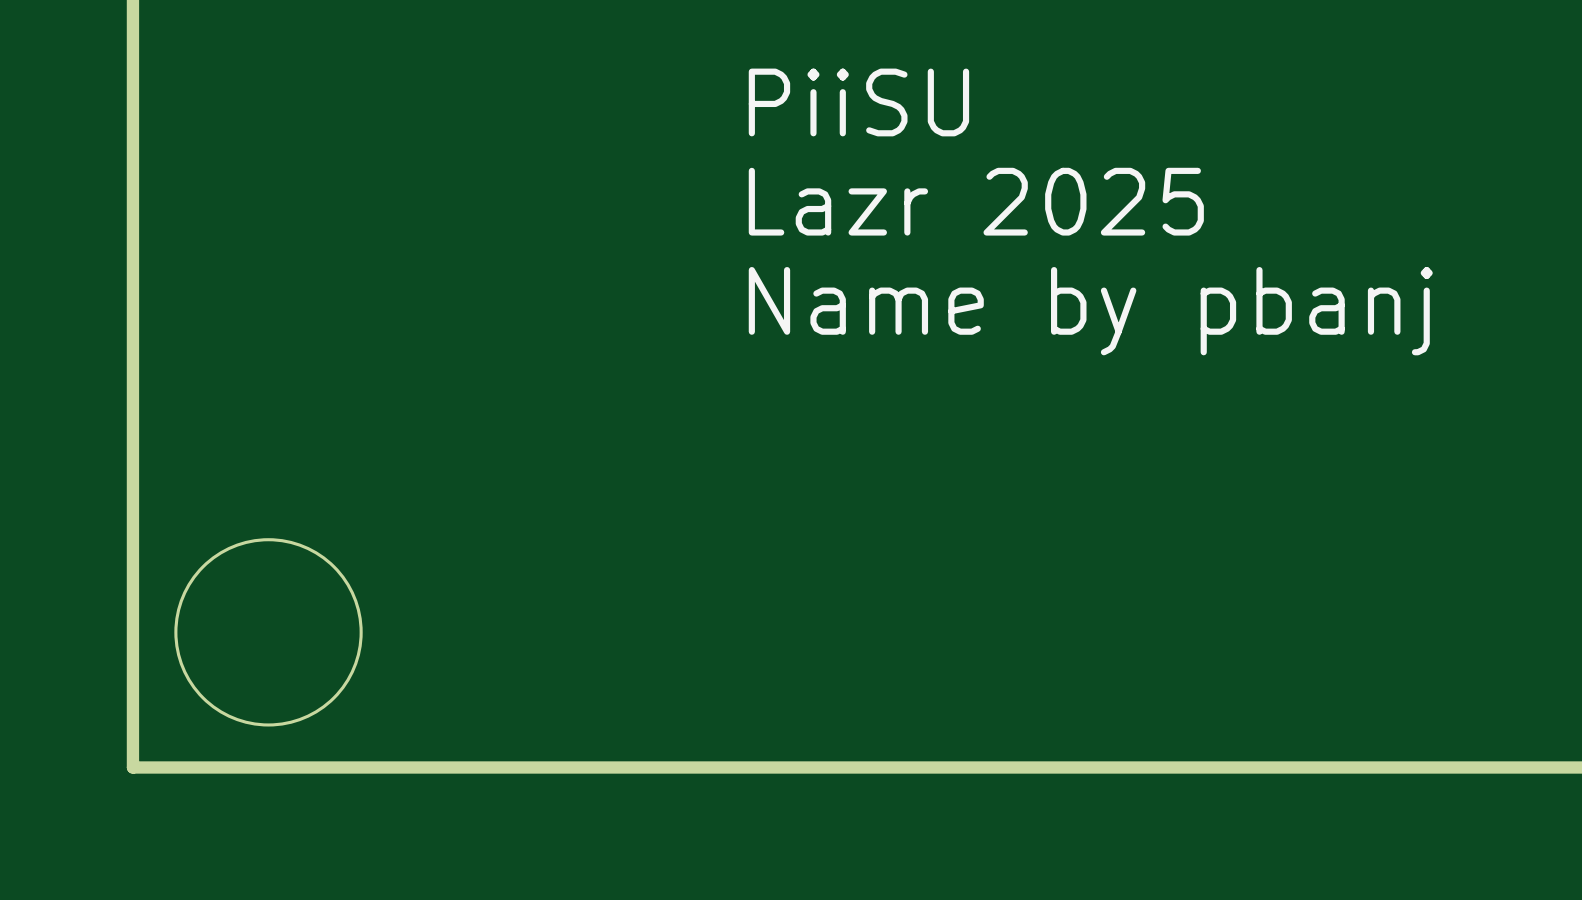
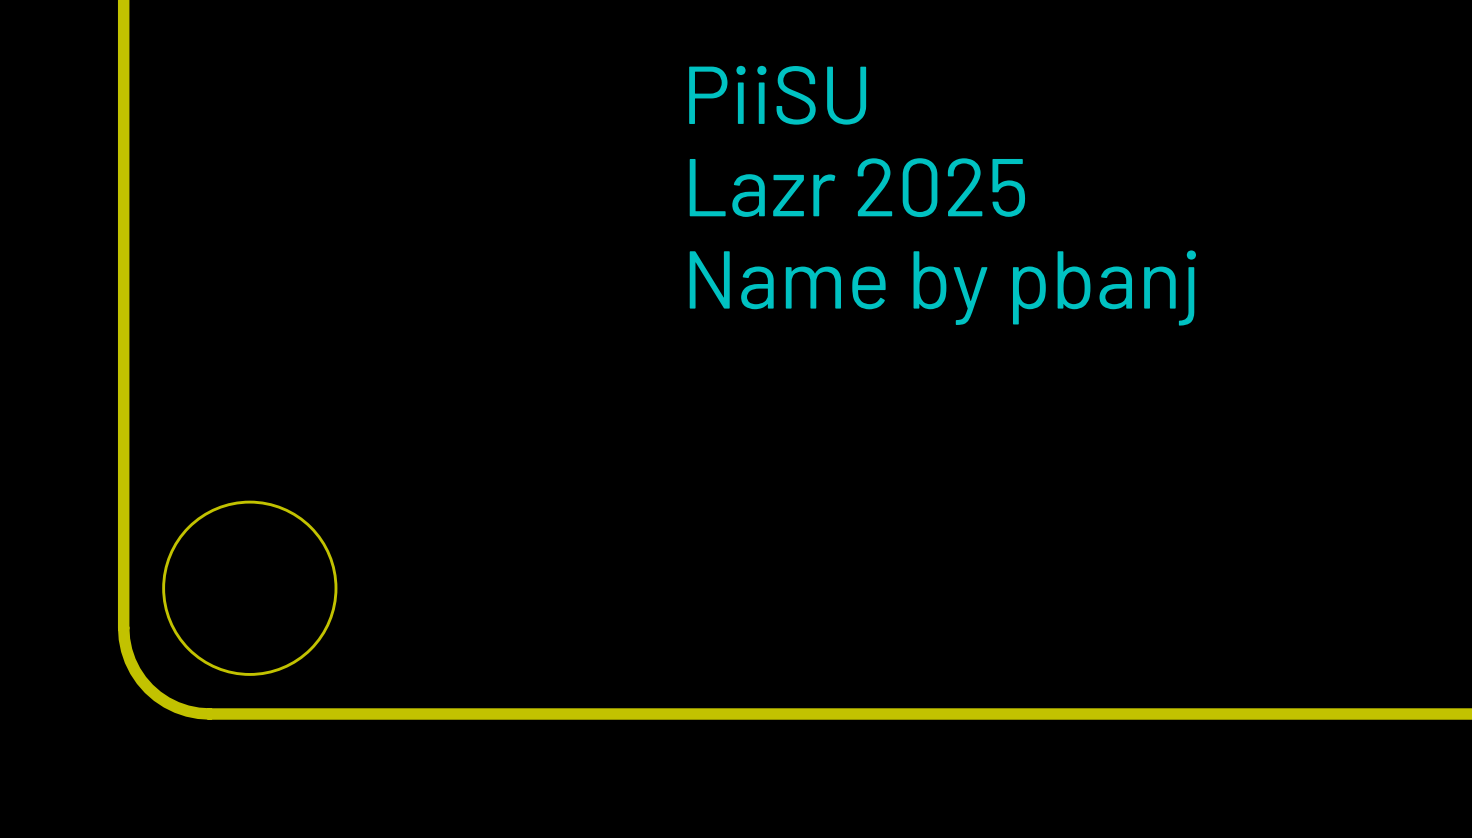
board edge: (132, 675) (132, 767) (225, 767) -> (123, 628) (130, 660) (148, 688) (176, 707) (209, 714)

